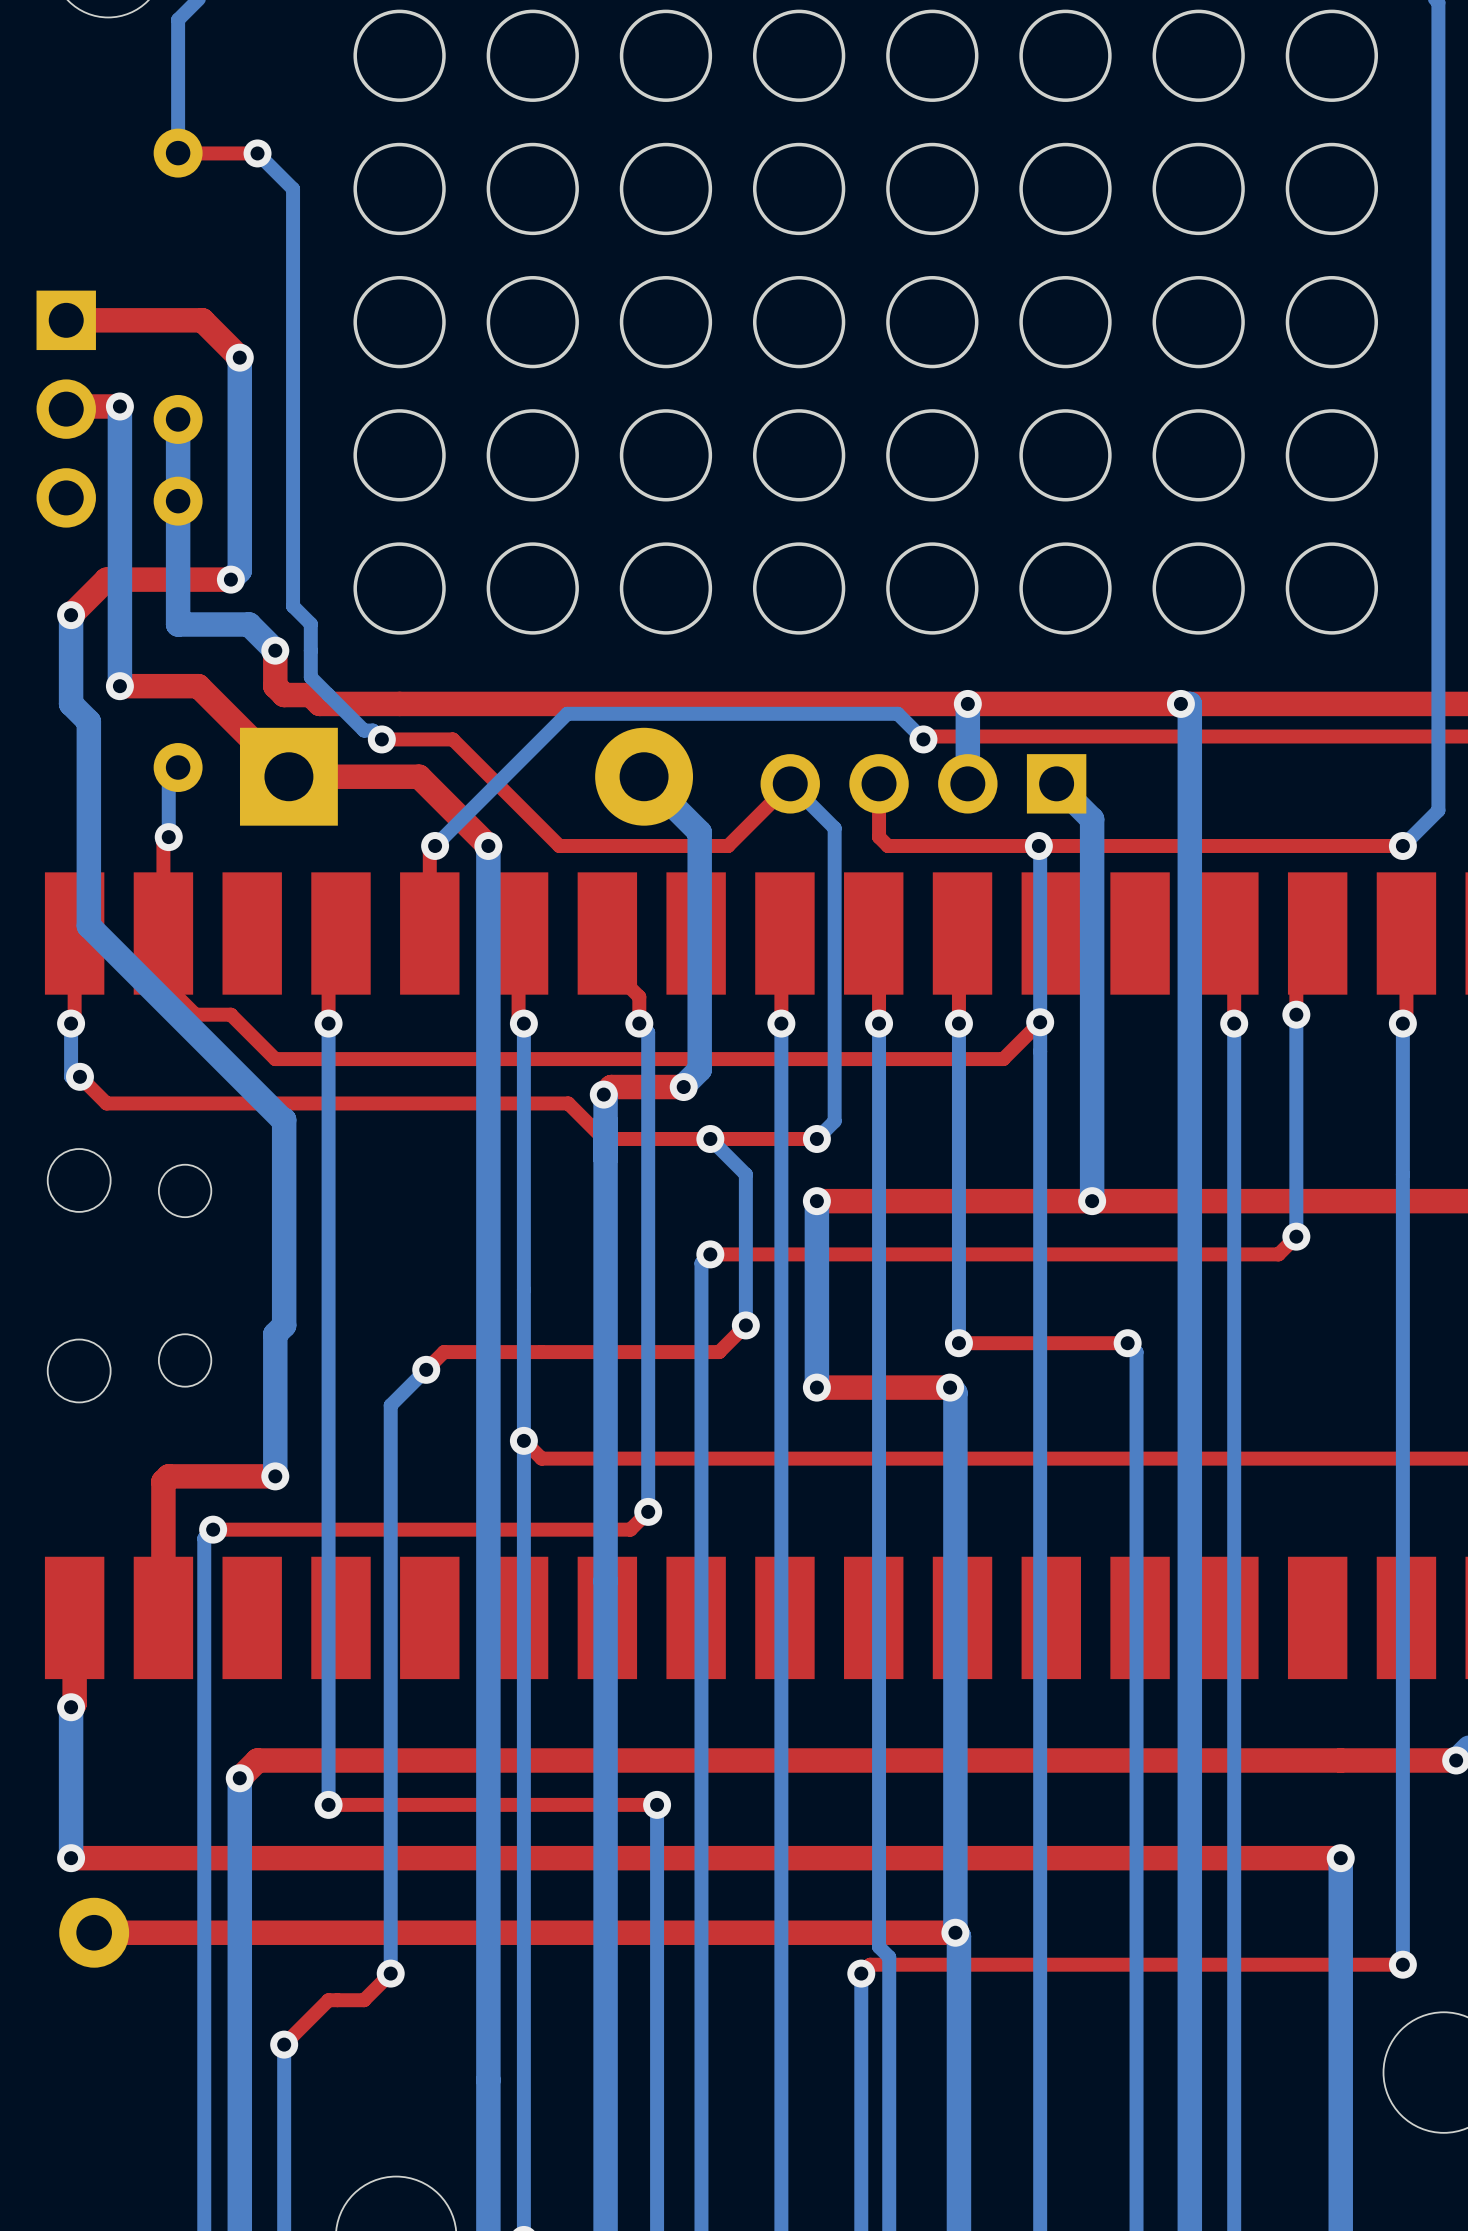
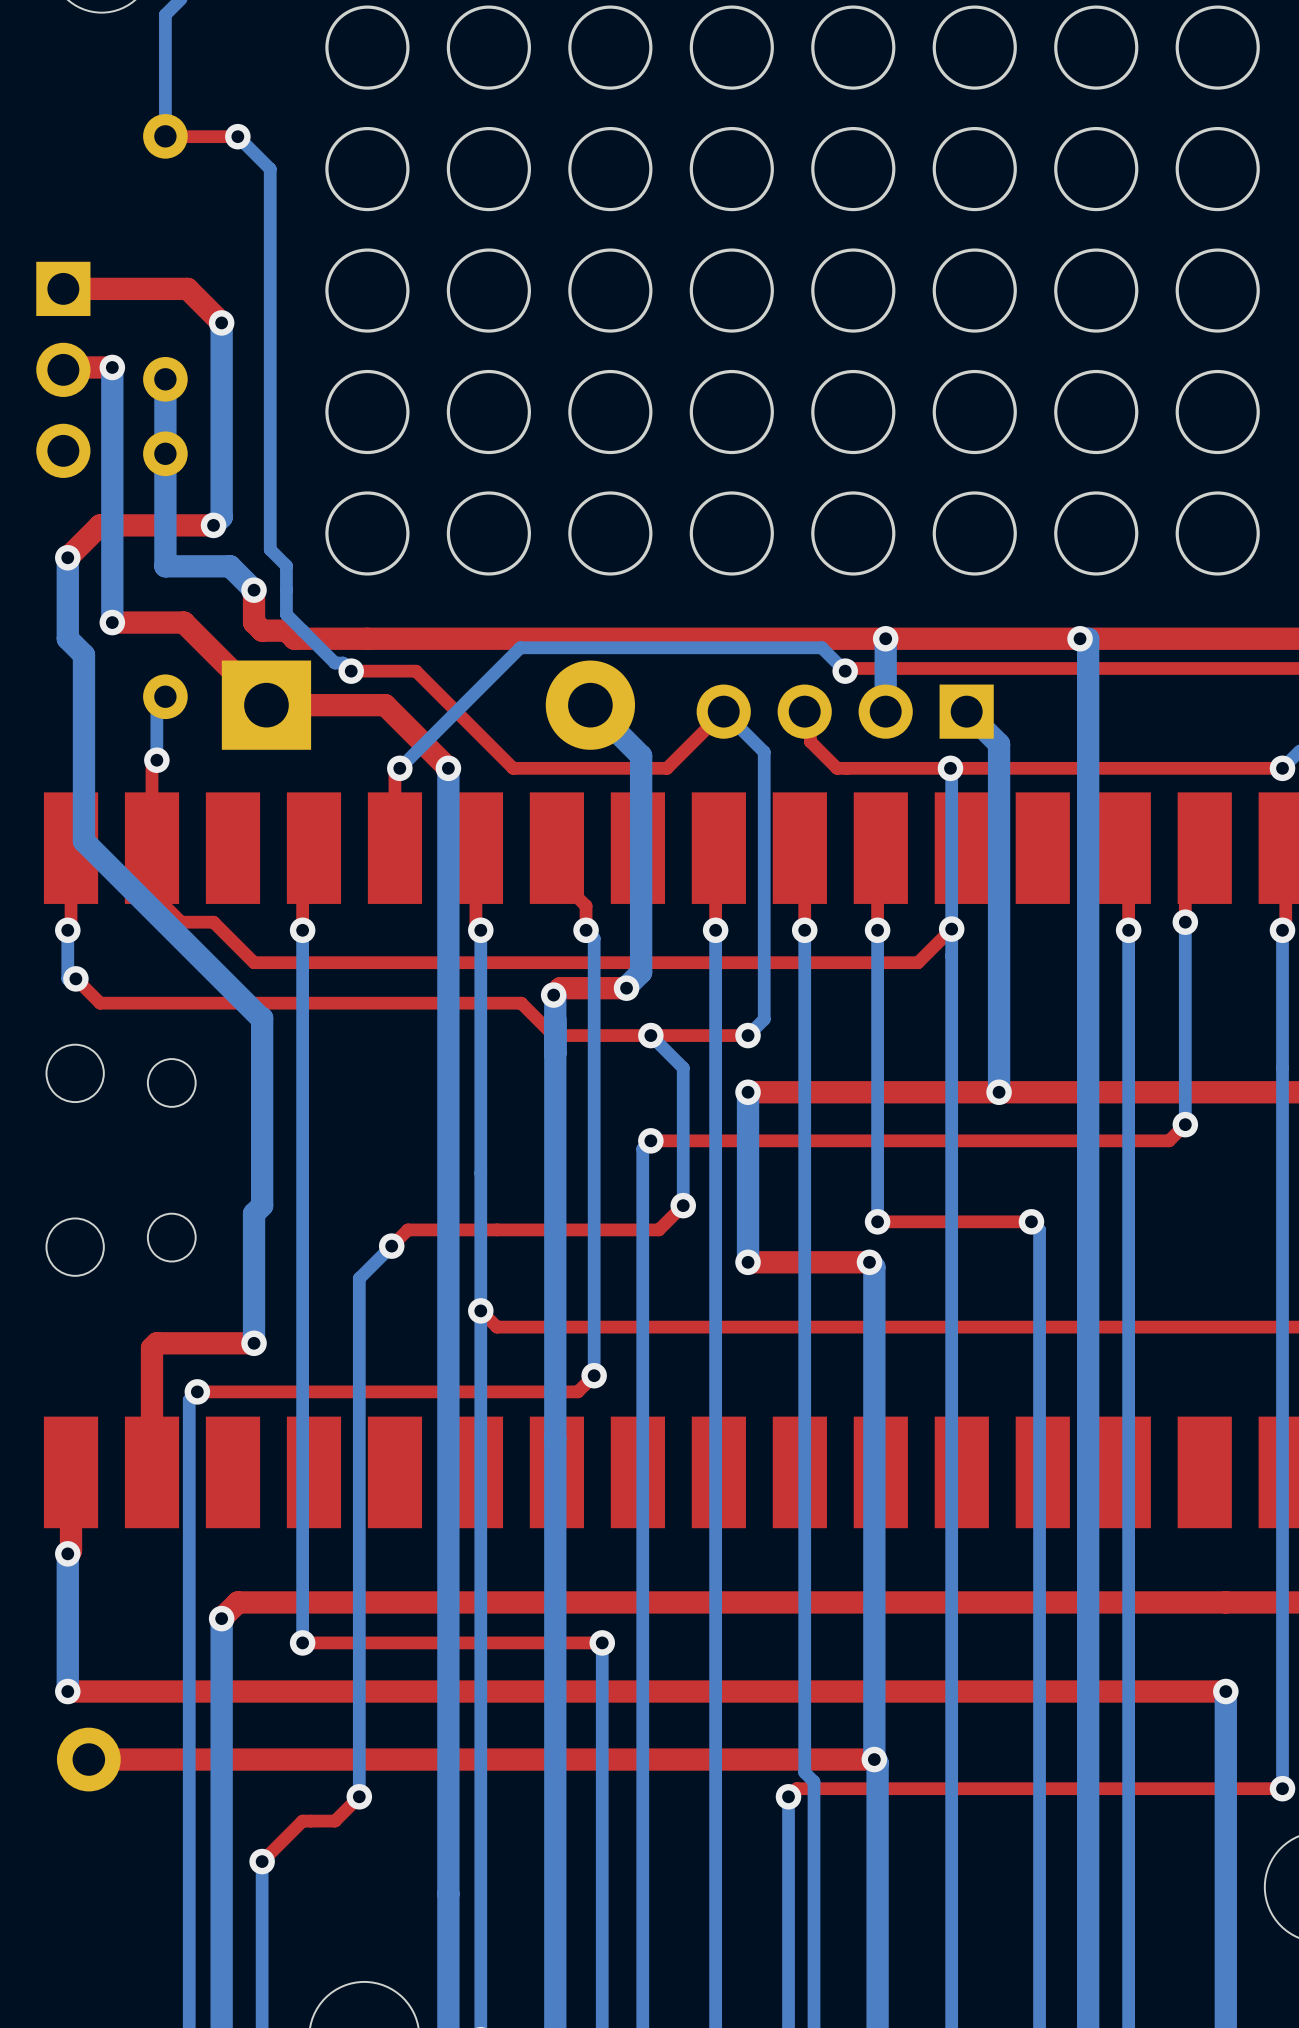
top track: (879, 783) (879, 837) (887, 845) (914, 845) -> (810, 711) (810, 741) (837, 768)

